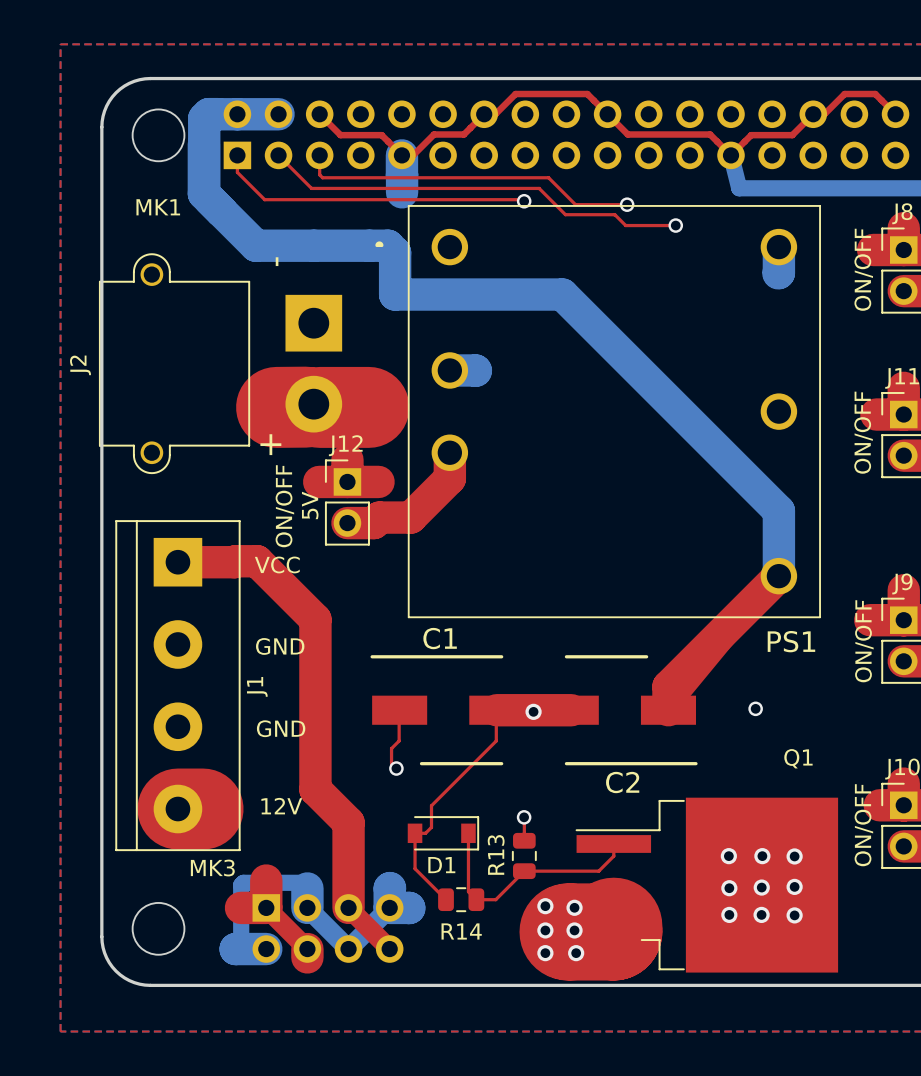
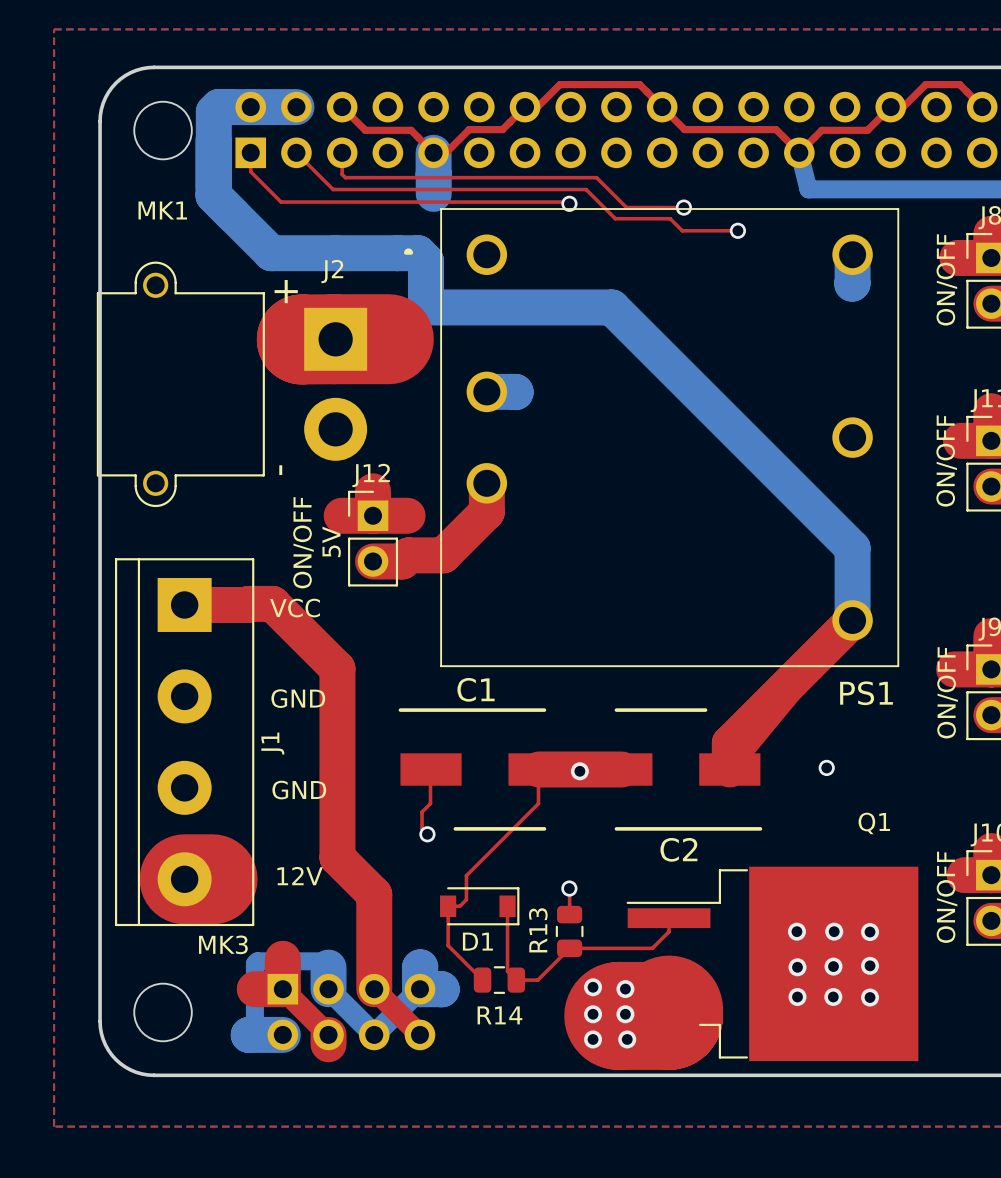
J2 text position: - (277, 261) -> - (280, 470)
top track: none -> (302, 339) (388, 339)
J2 name rotation: 0° (80, 365) -> 90° clockwise (332, 271)
J2 name position: J2 (80, 365) -> J2 (332, 271)
top track: (305, 407) (276, 407) -> none
top track: (319, 407) (368, 407) -> none
J2 text position: + (270, 444) -> + (286, 291)

